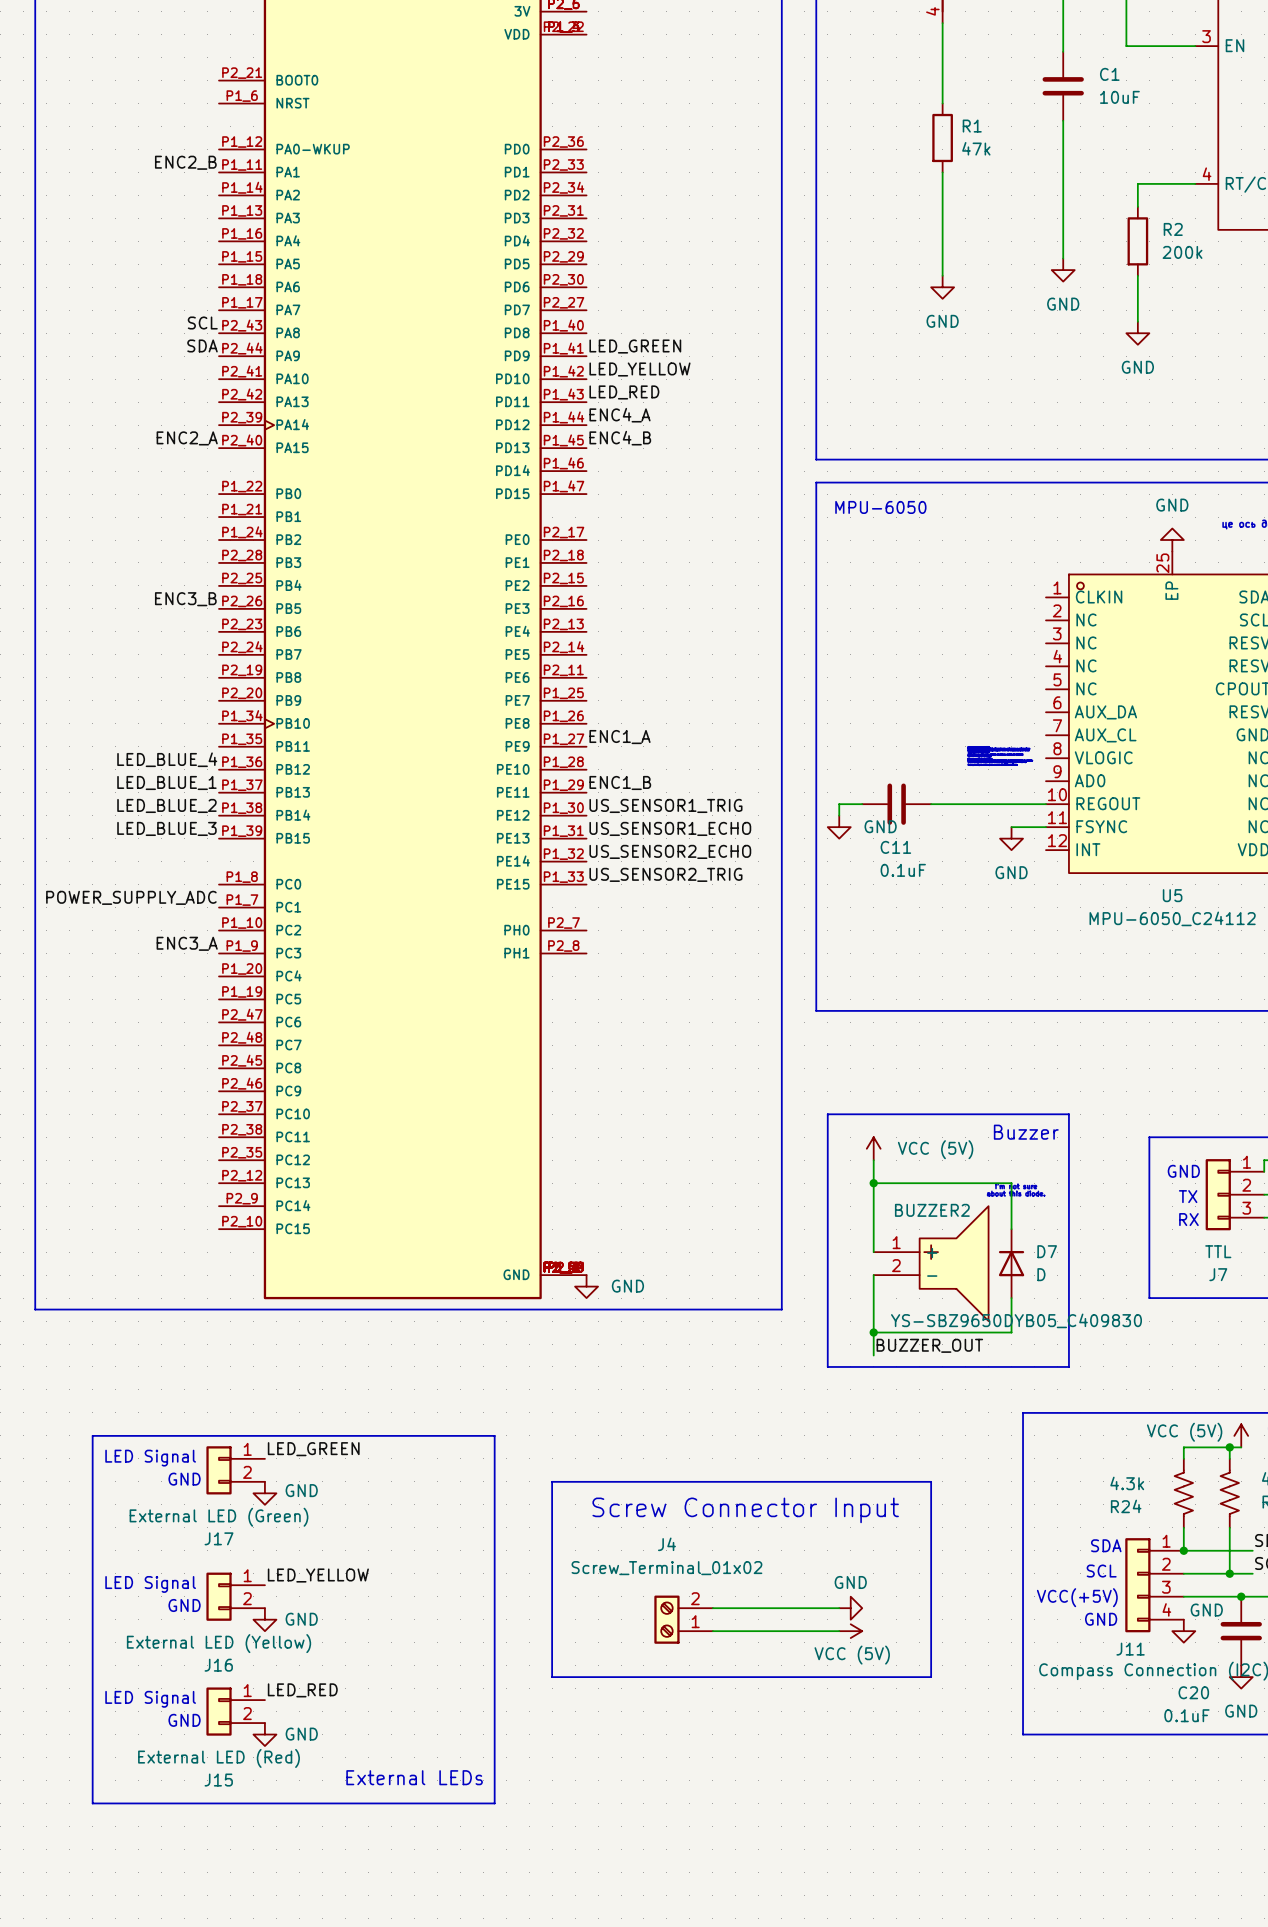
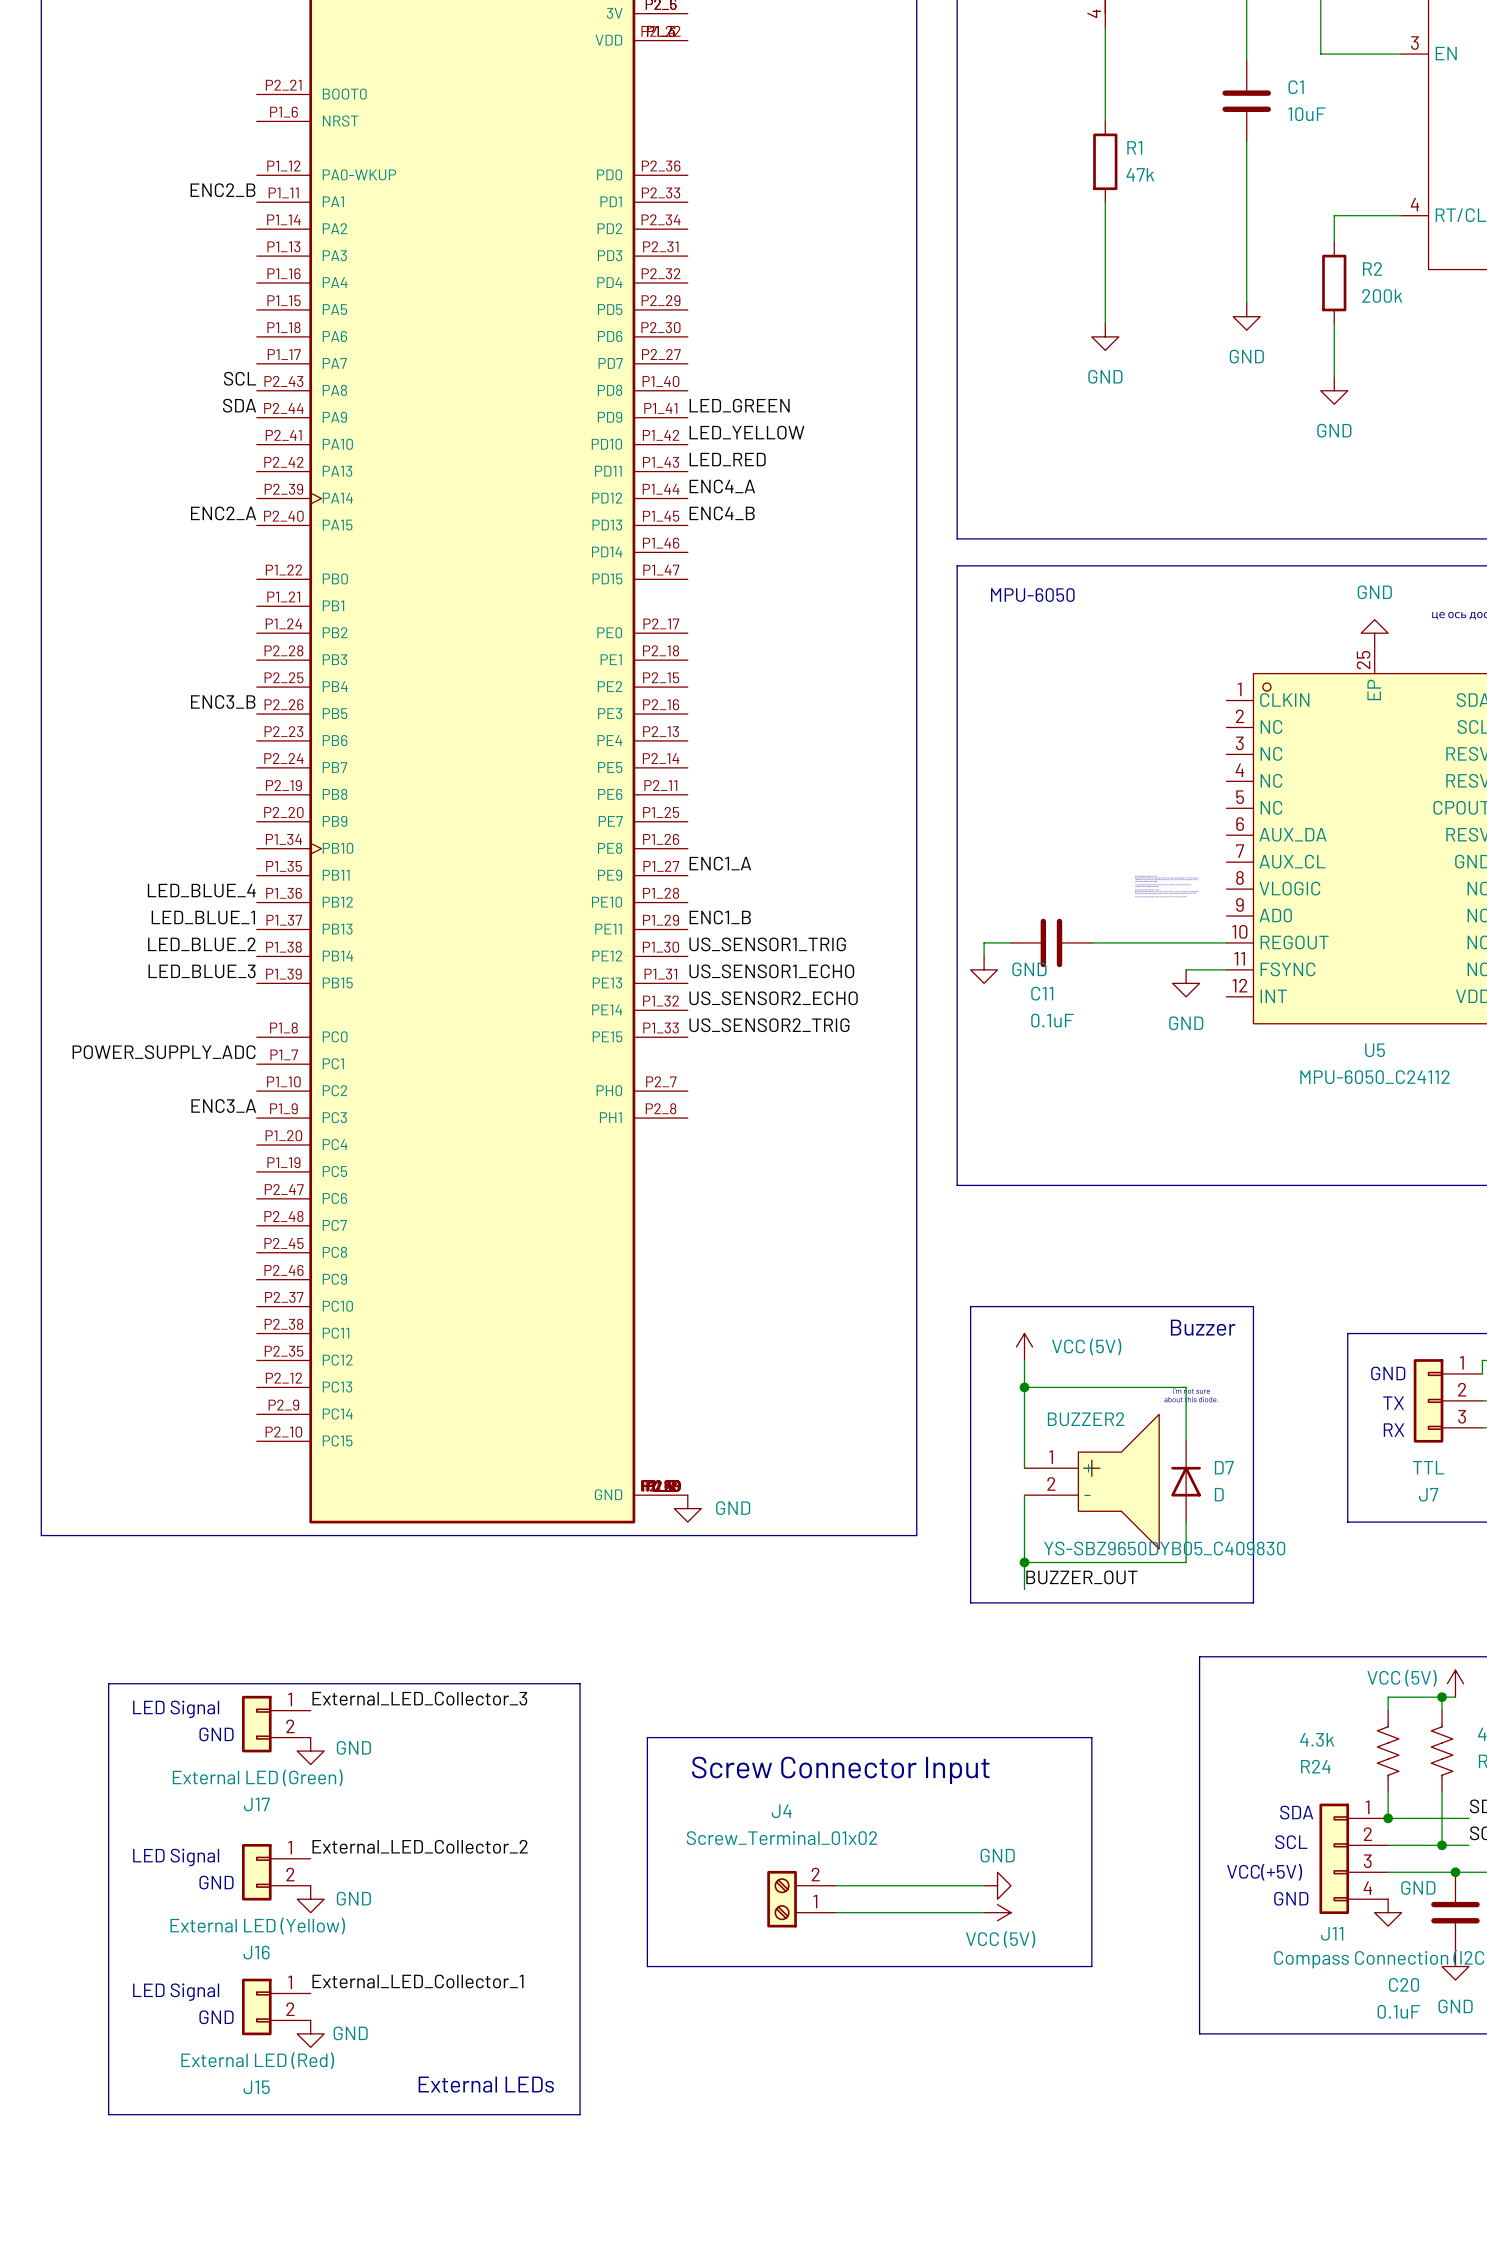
label: LED_GREEN (313, 1449) -> External_LED_Collector_3 (419, 1698)
label: LED_YELLOW (318, 1575) -> External_LED_Collector_2 (420, 1846)
label: LED_RED (302, 1690) -> External_LED_Collector_1 (417, 1981)

